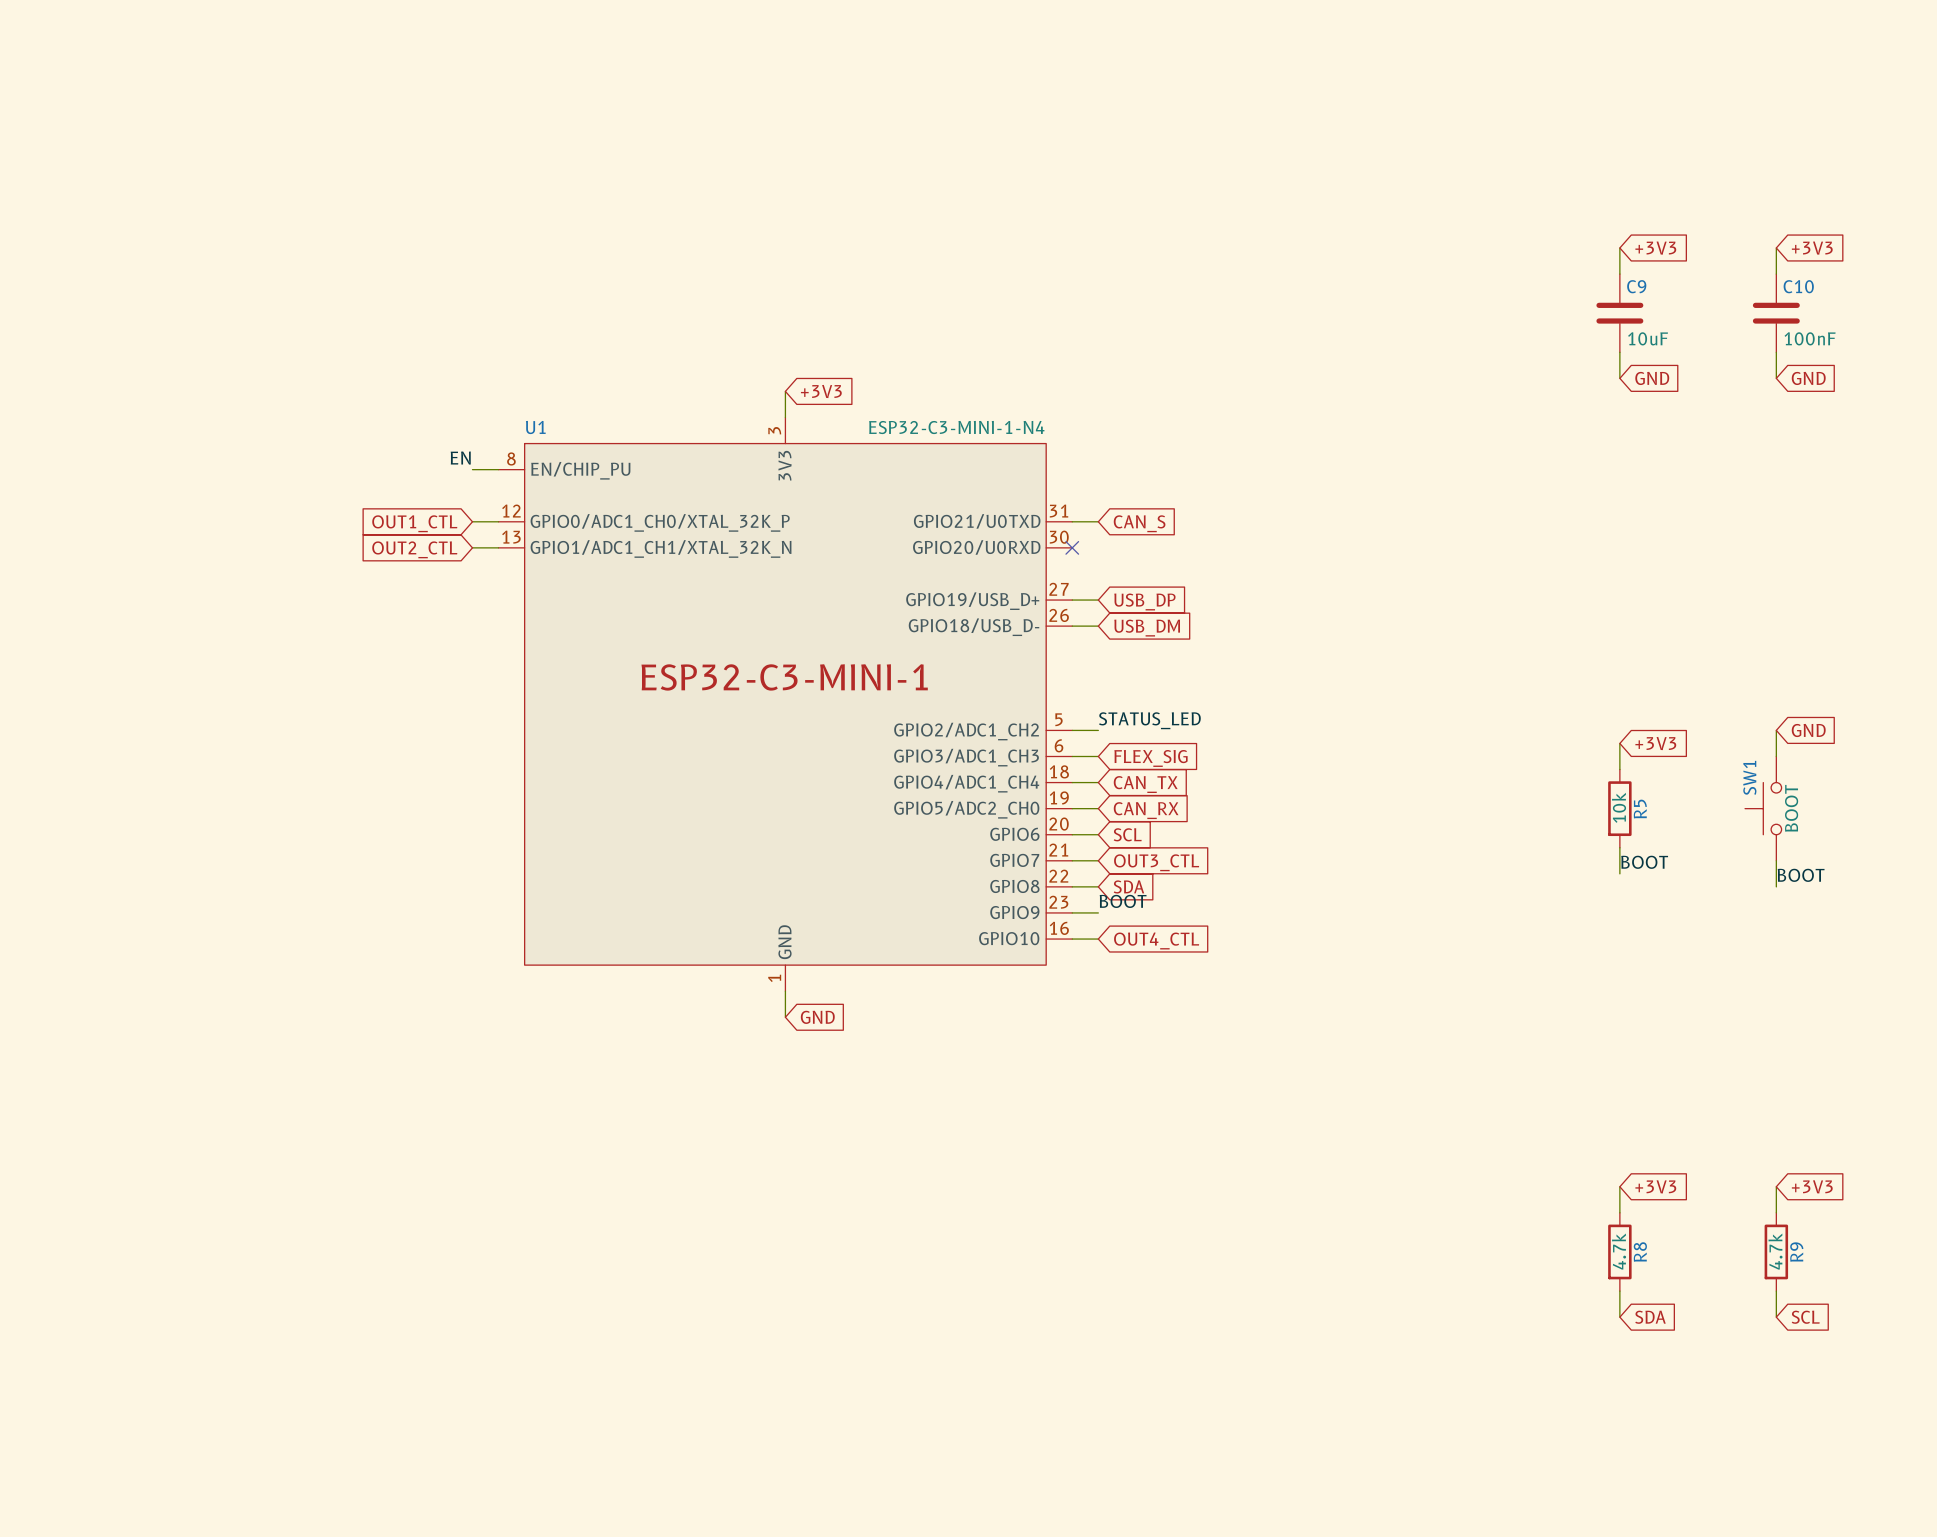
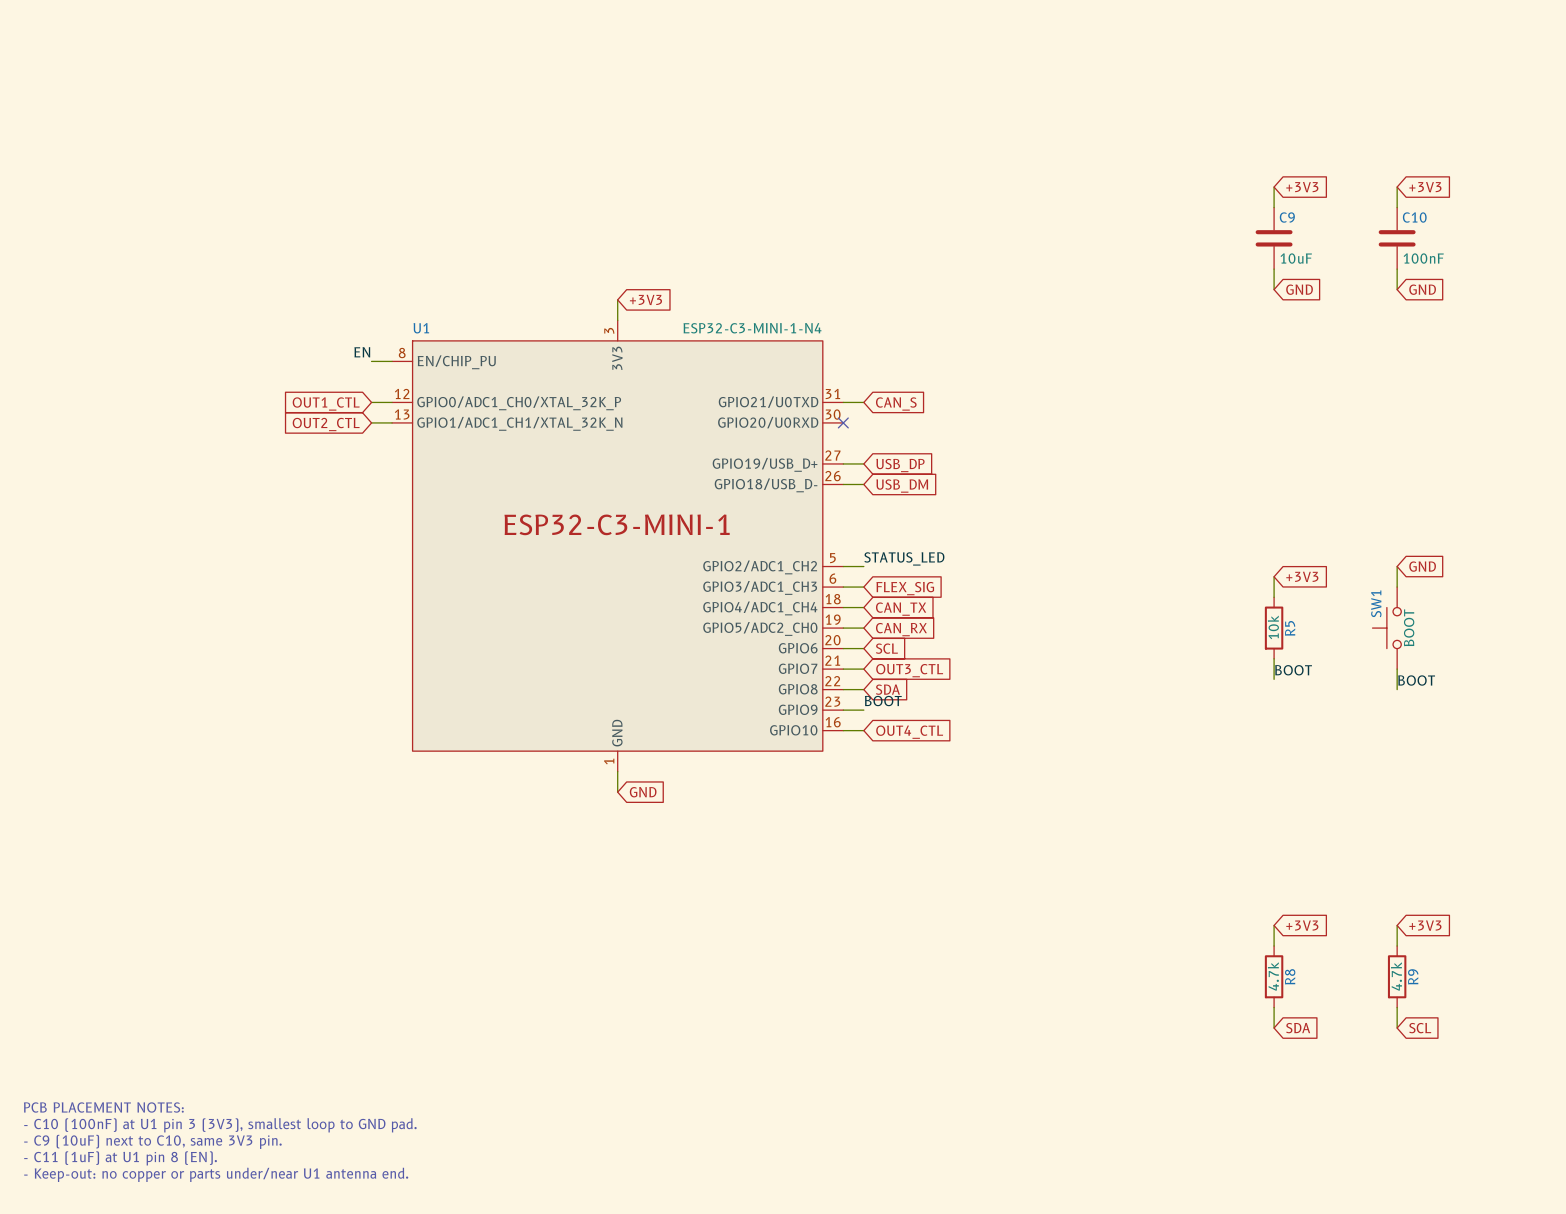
text: none -> PCB PLACEMENT NOTES: (103, 1107)
text: none -> - C10 (100nF) at U1 pin 3 (3V3), smallest loop to GND pad. (220, 1125)
text: none -> - C9 (10uF) next to C10, same 3V3 pin. (152, 1141)
text: none -> - C11 (1uF) at U1 pin 8 (EN). (120, 1158)
text: none -> - Keep-out: no copper or parts under/near U1 antenna end. (216, 1174)

